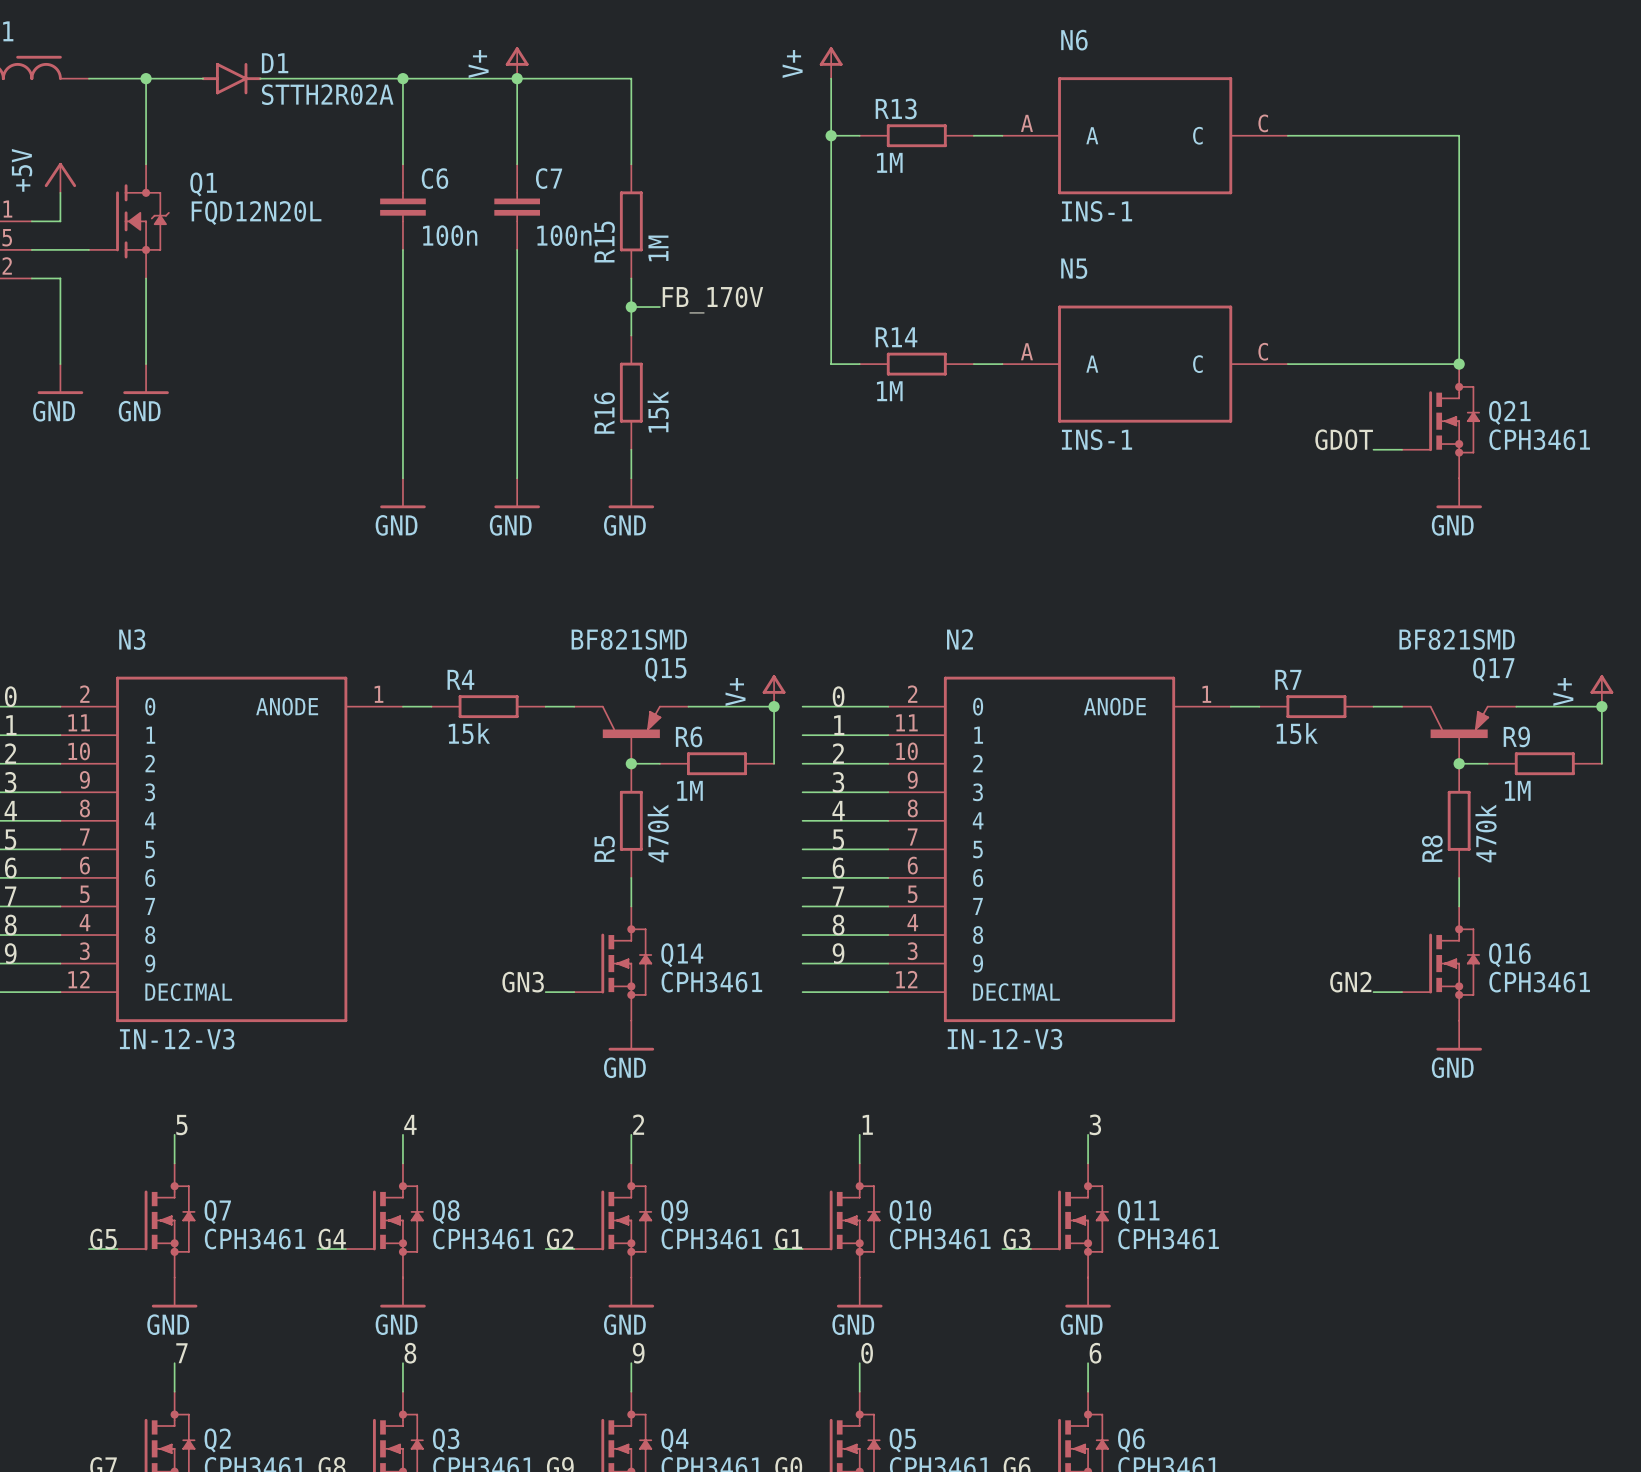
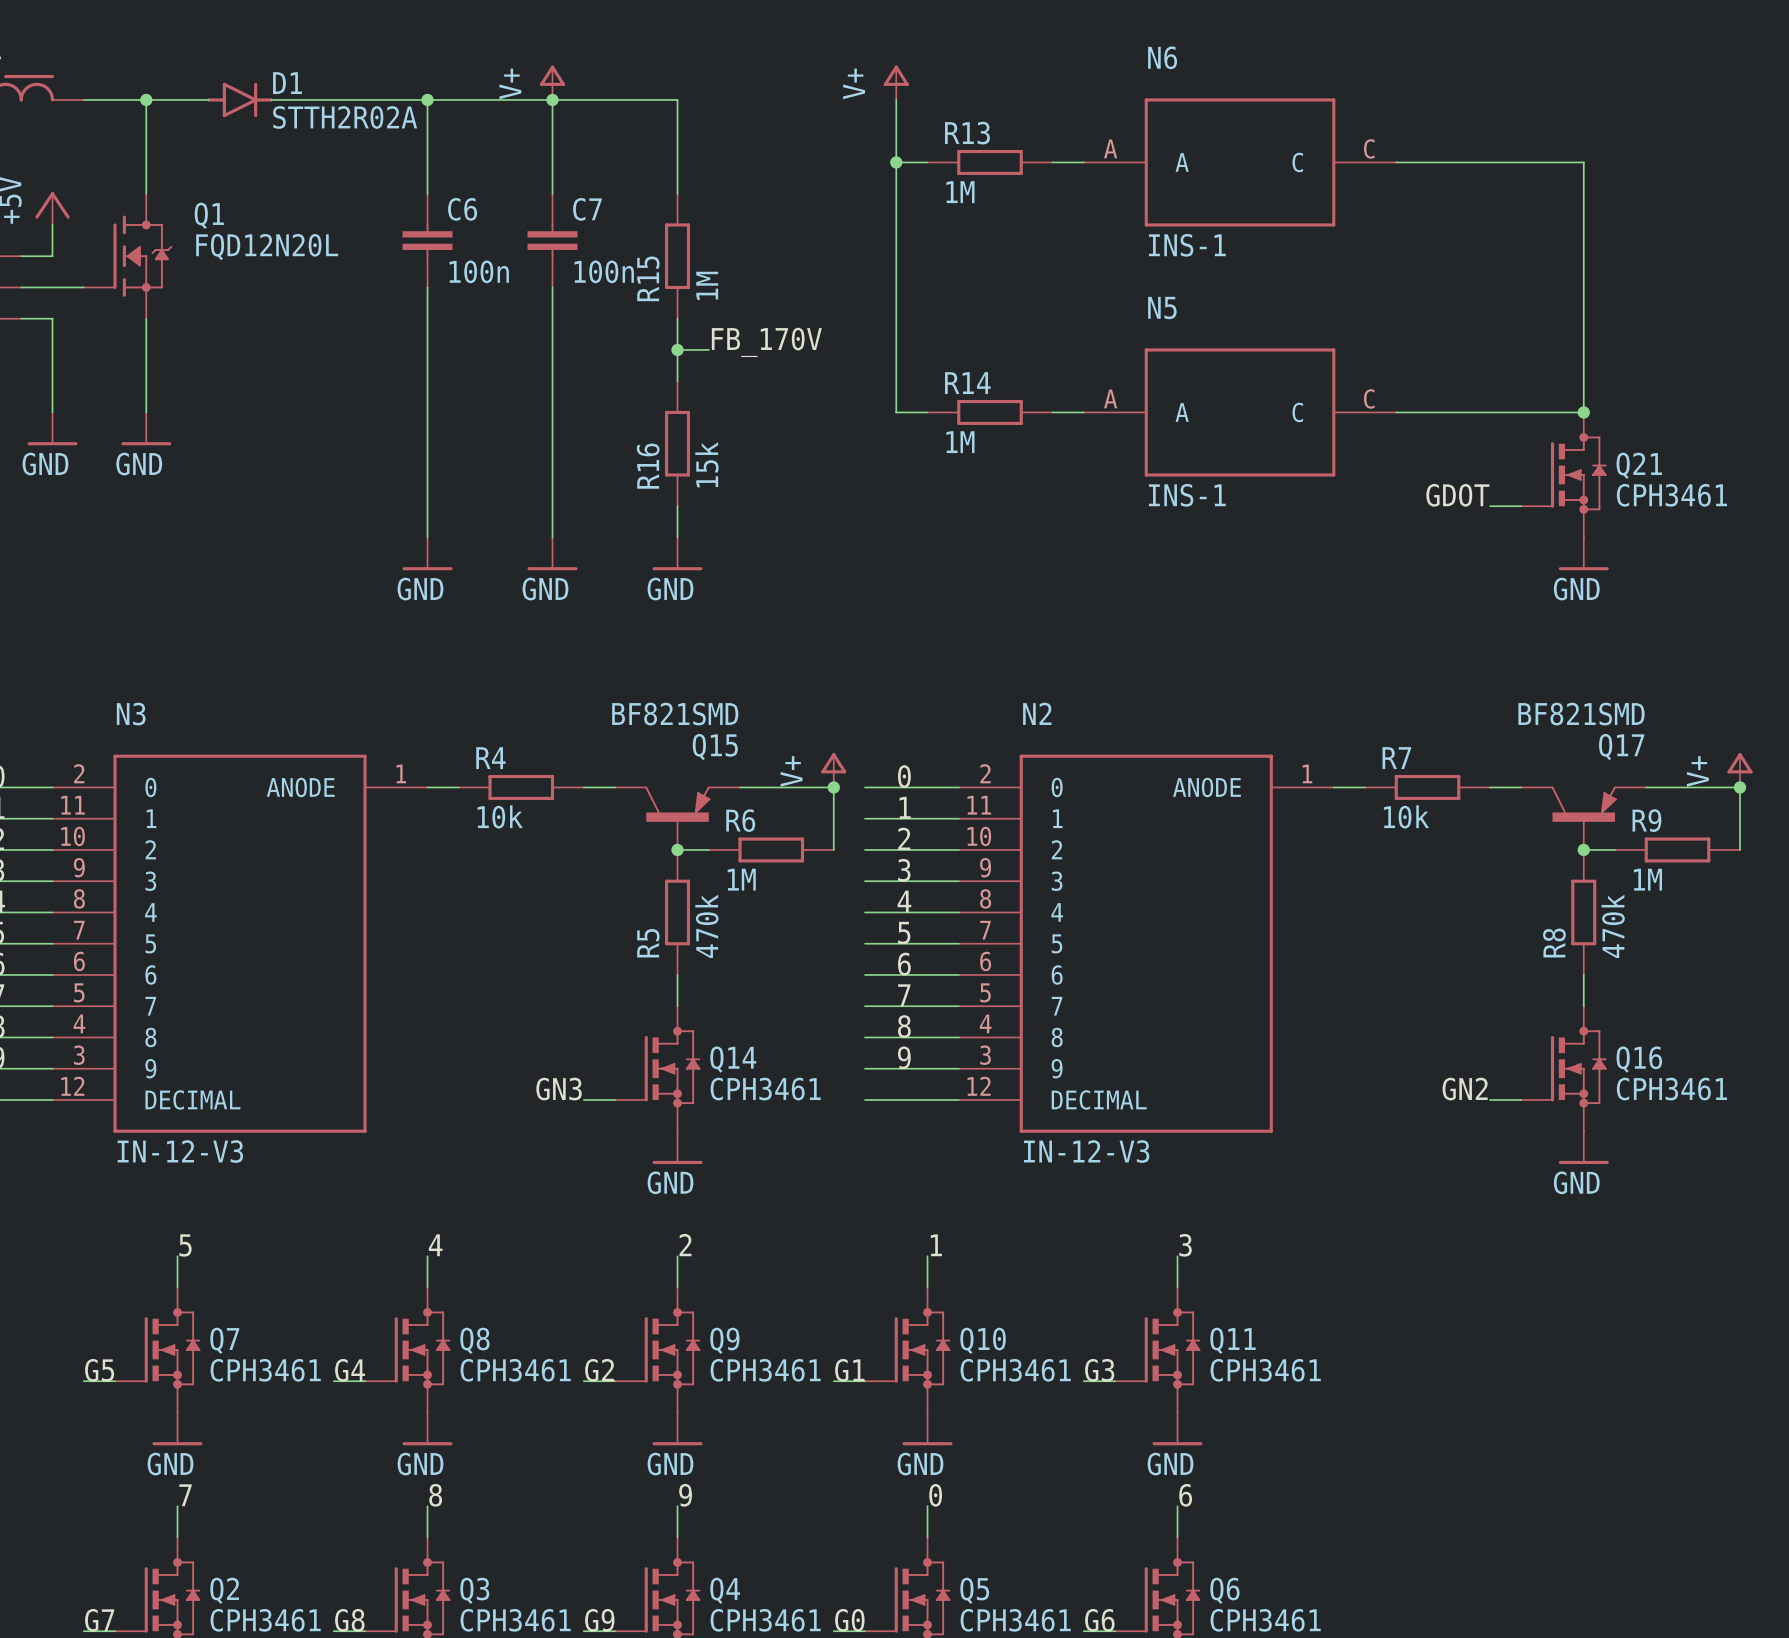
R4 value: 15k (469, 733) -> 10k (500, 816)
R7 value: 15k (1297, 733) -> 10k (1406, 816)

